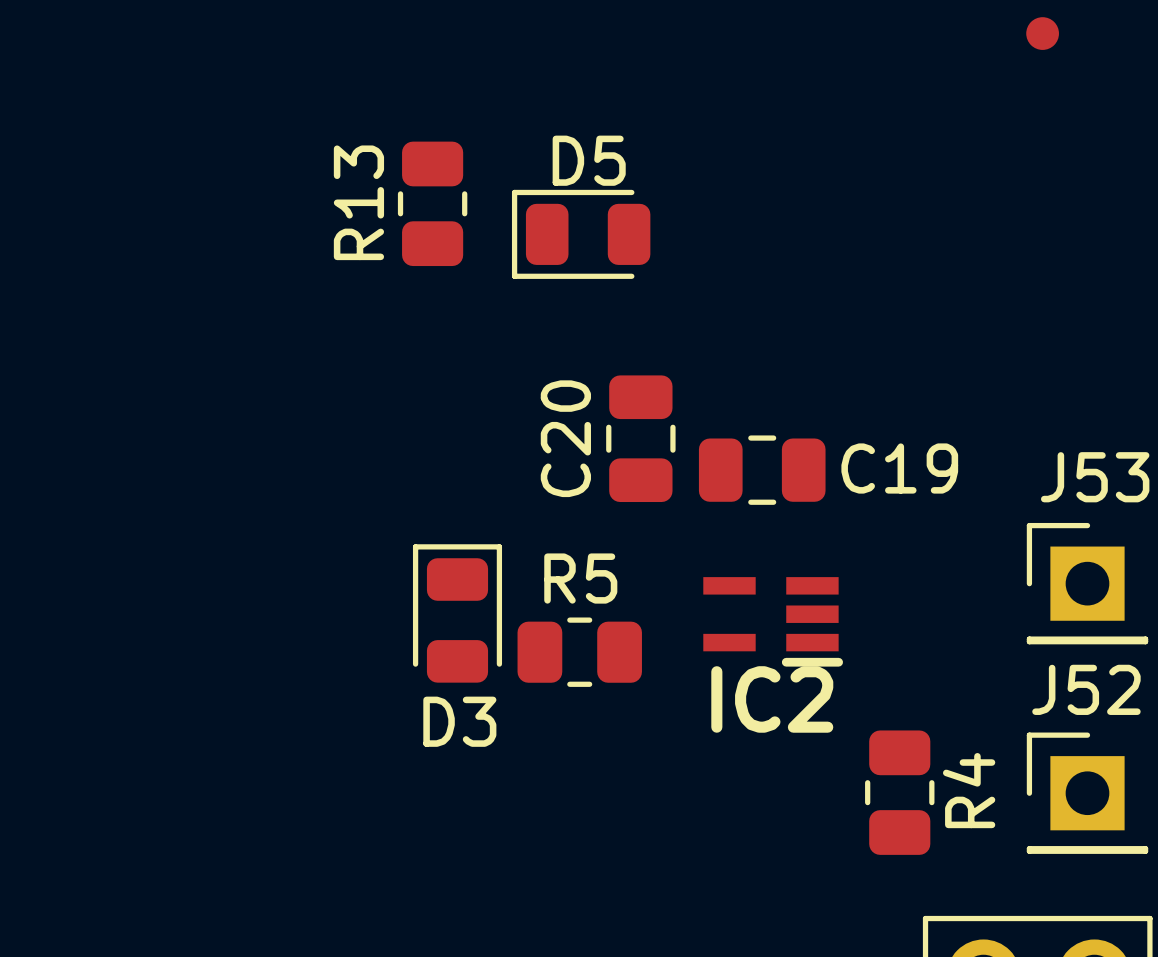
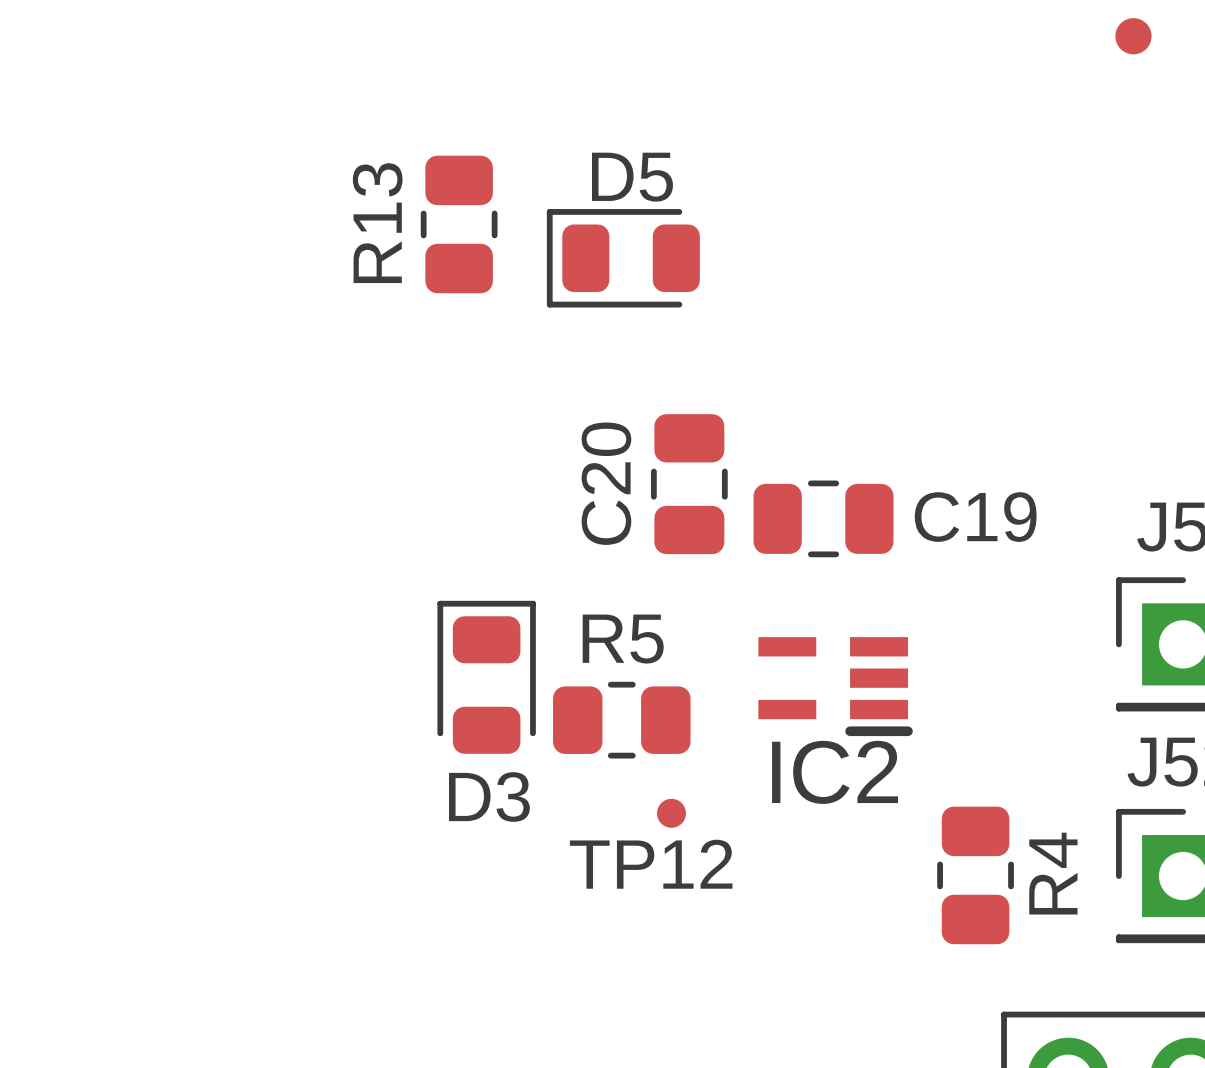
TP12: none -> (671, 813)

